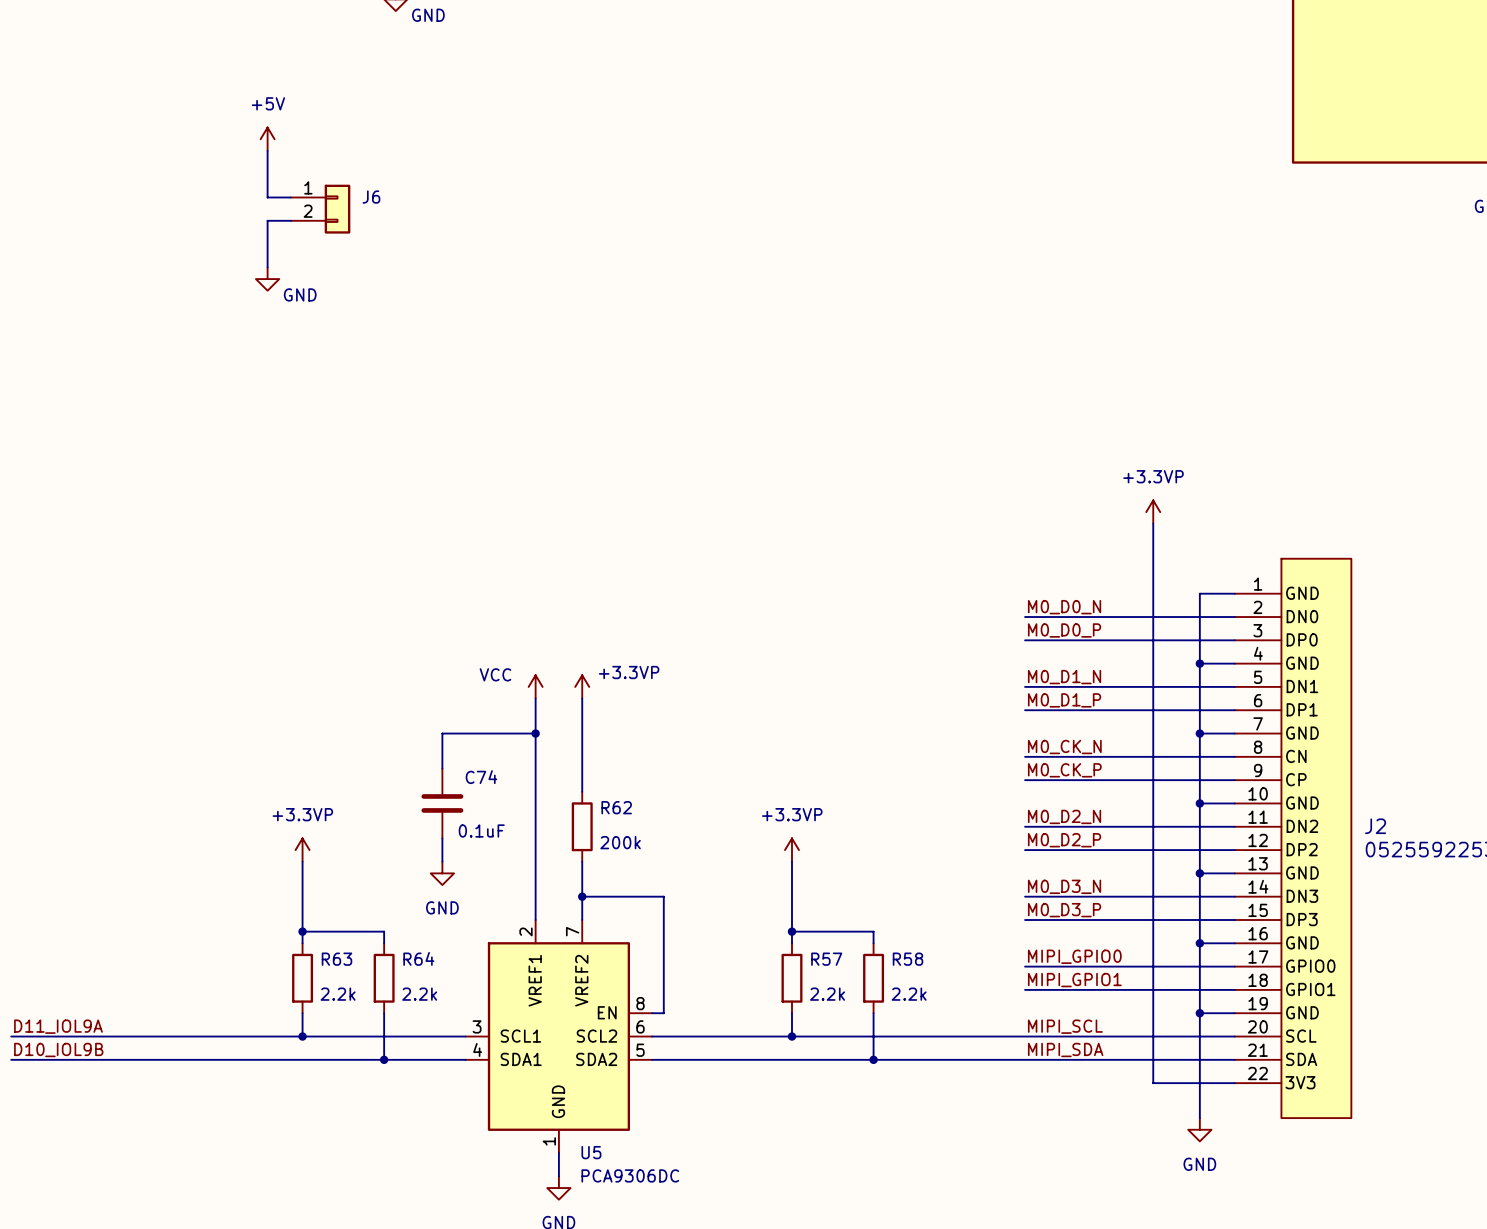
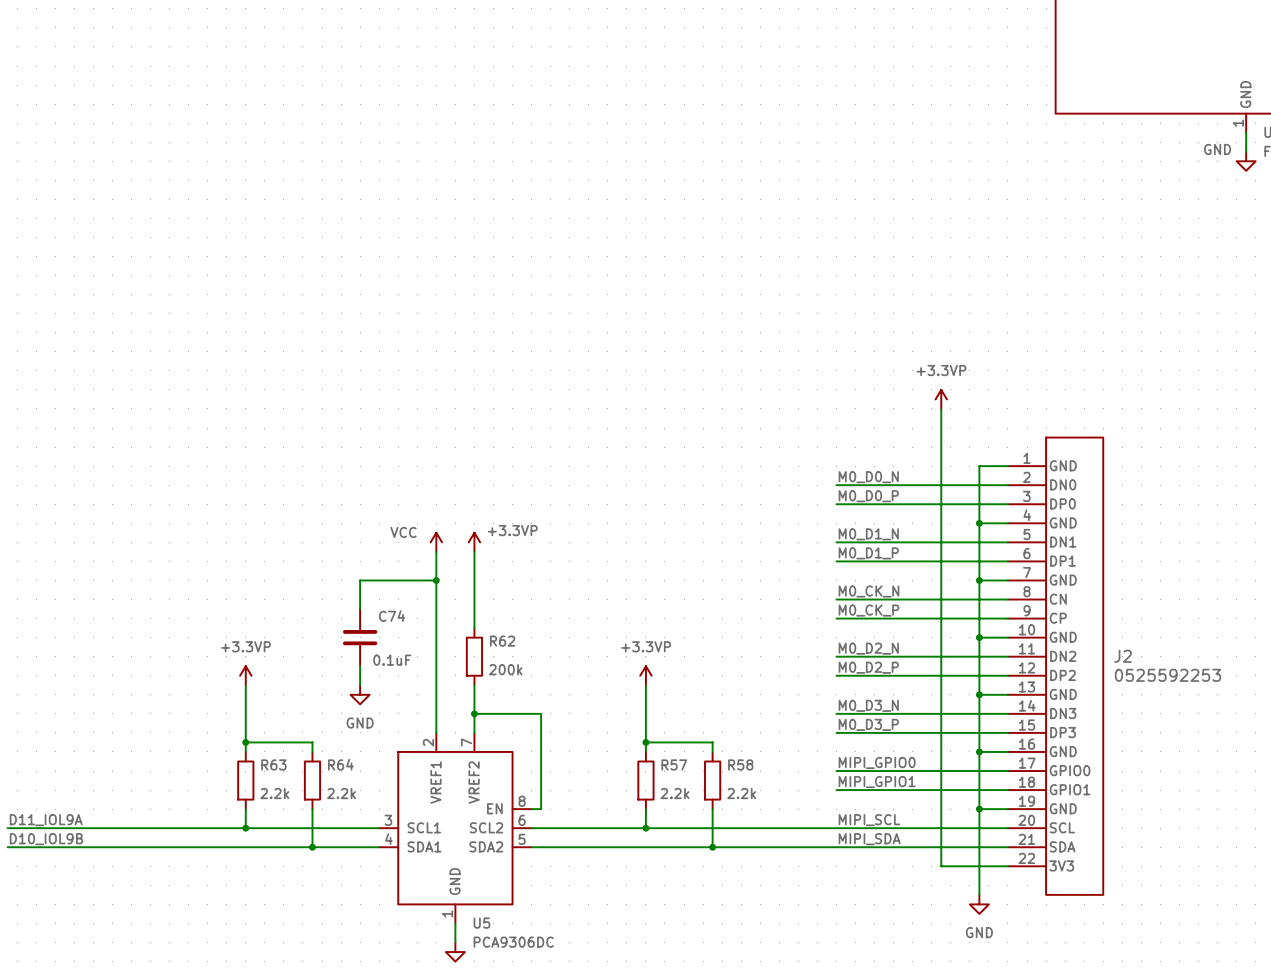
power symbol: +5V (267, 139) -> none
wire: (267, 150) (267, 197) (290, 197) -> none
J6: (320, 209) -> none
wire: (290, 220) (267, 220) (267, 267) -> none
power symbol: GND (267, 279) -> none

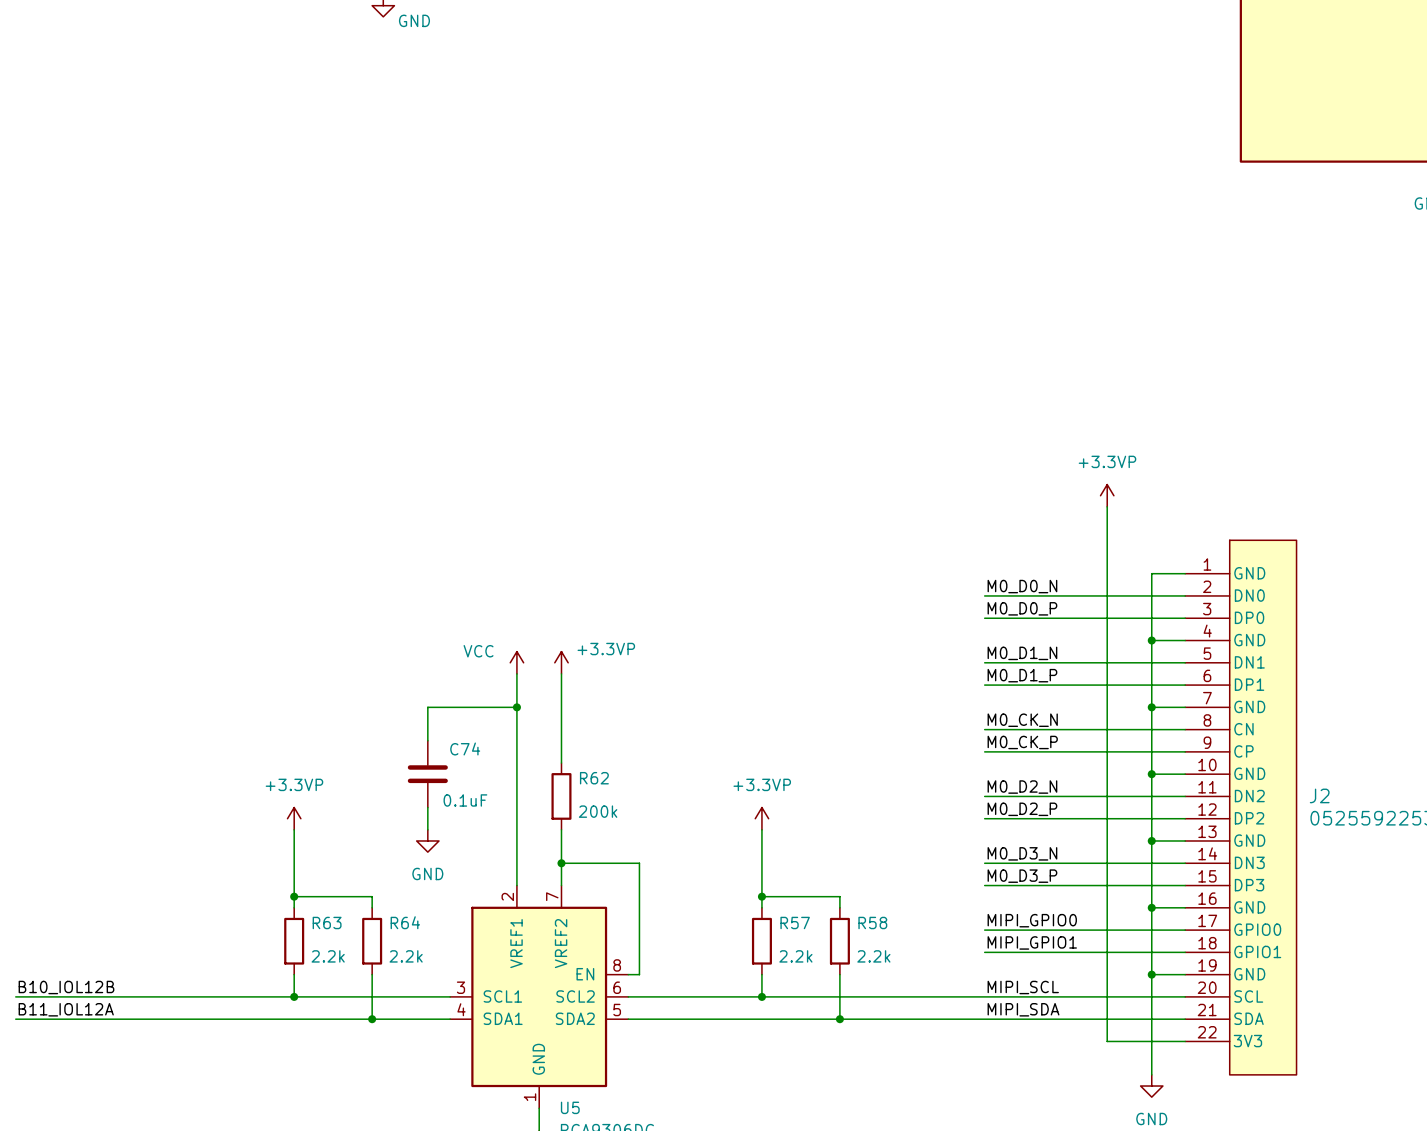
label: D11_IOL9A (46, 820) -> B10_IOL12B (66, 987)
label: D10_IOL9B (46, 839) -> B11_IOL12A (66, 1009)

